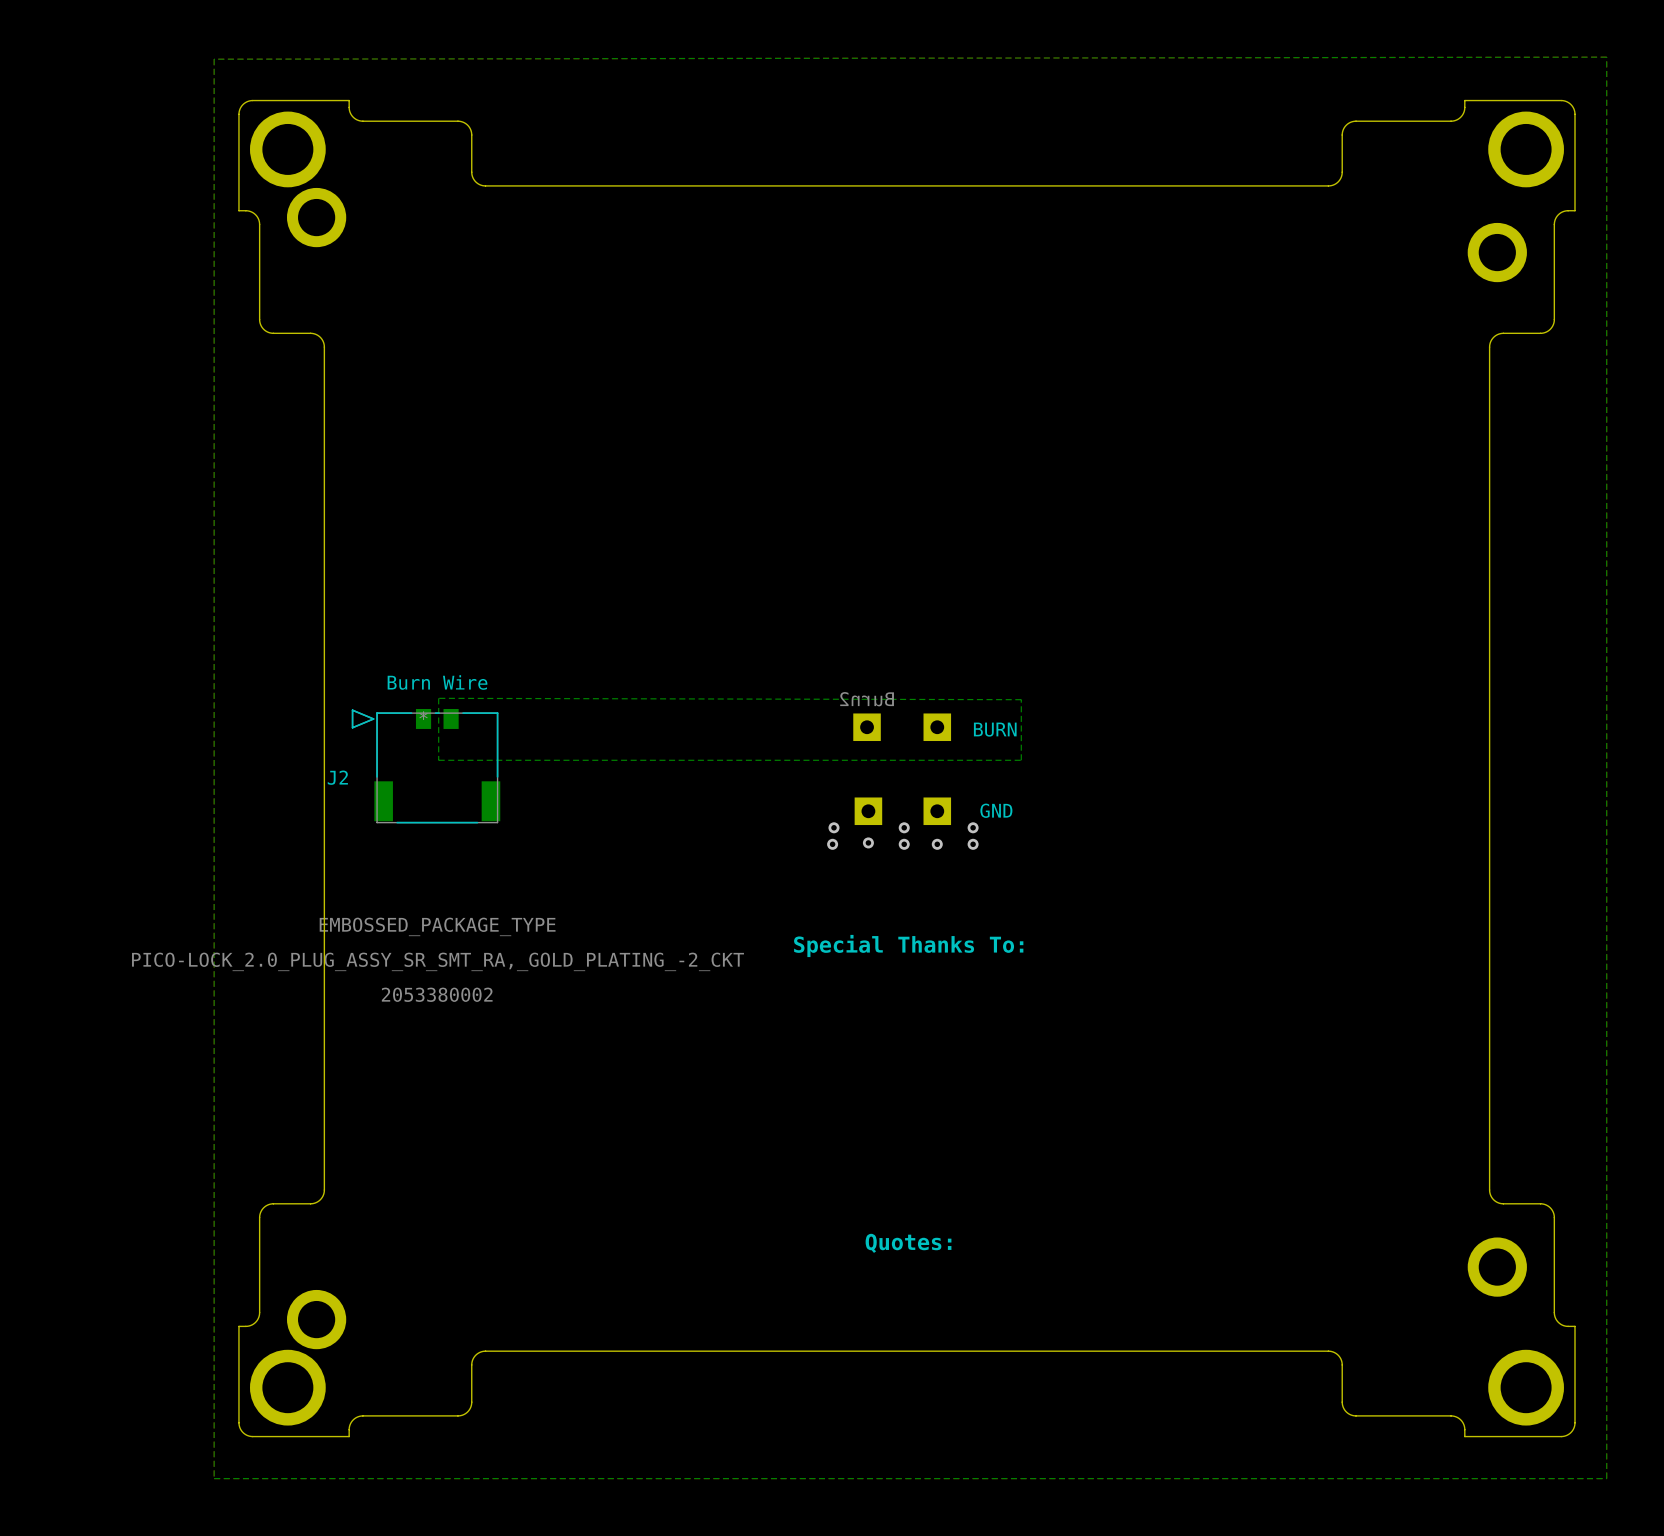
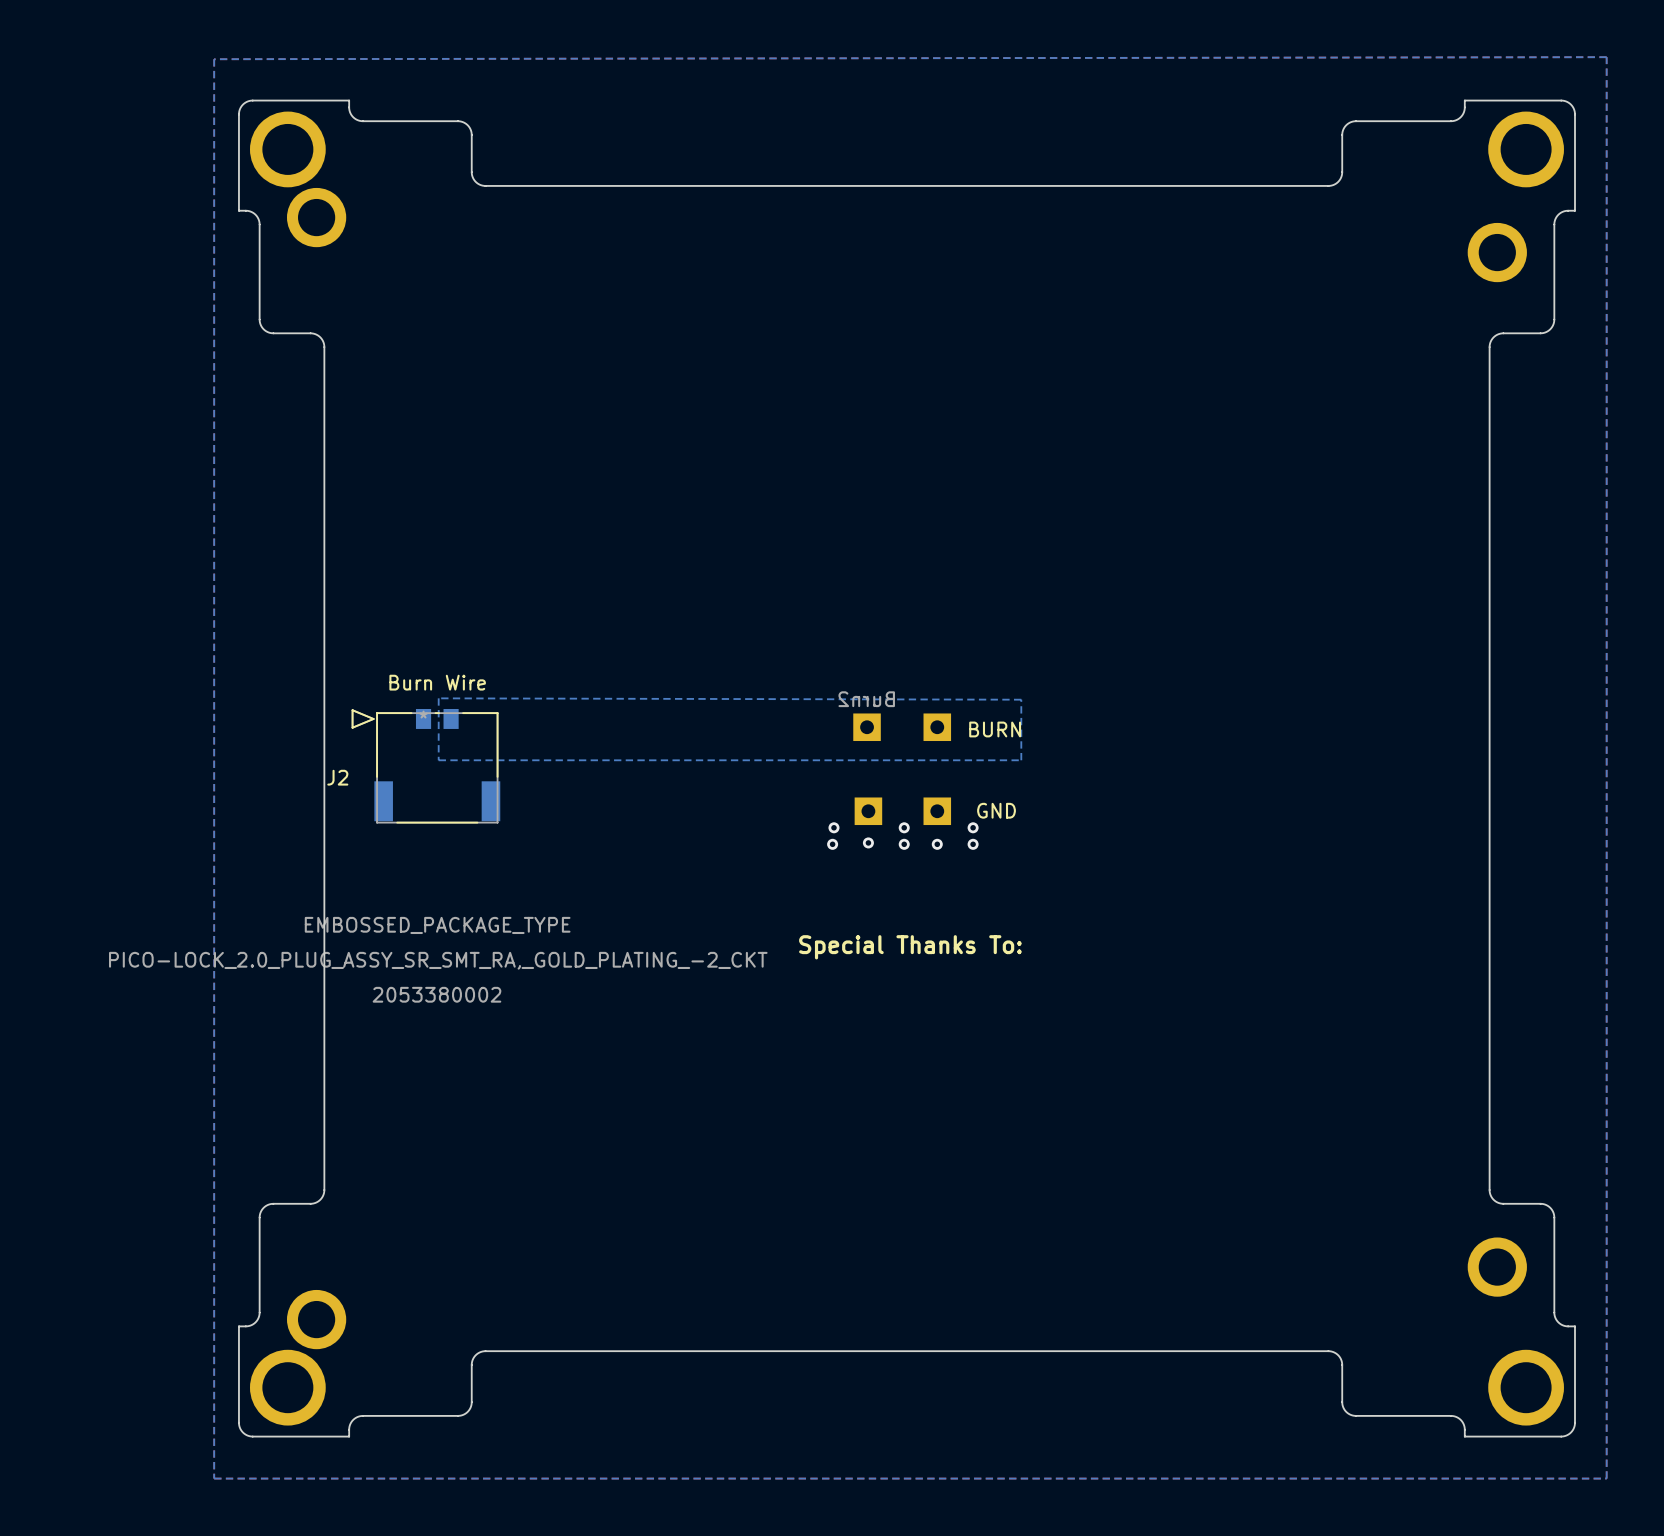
text: Quotes: (908, 1243) -> none

